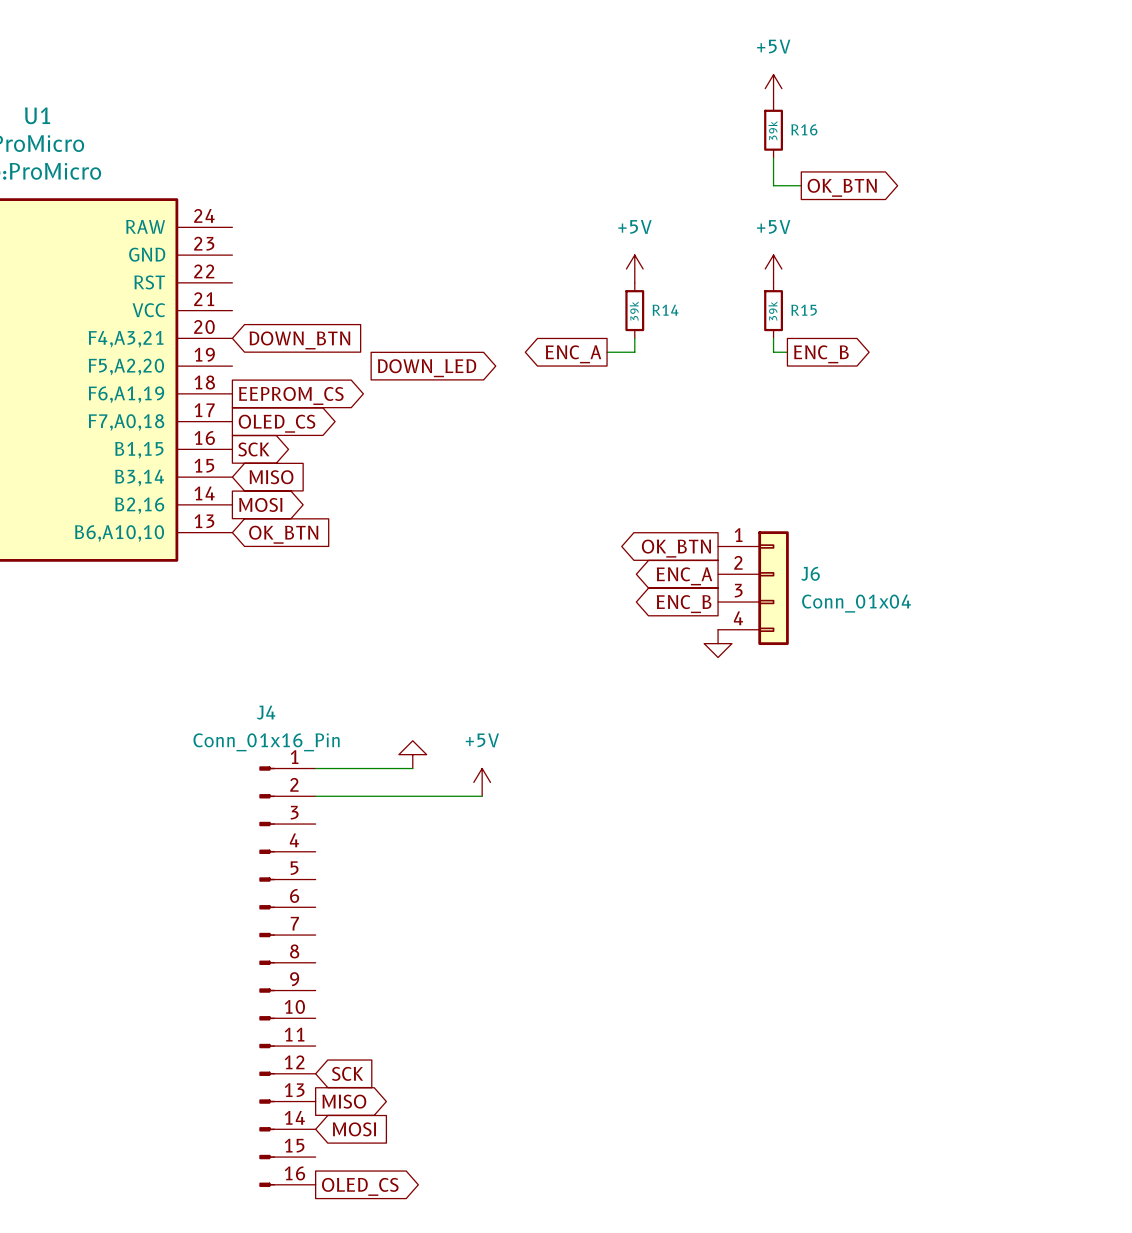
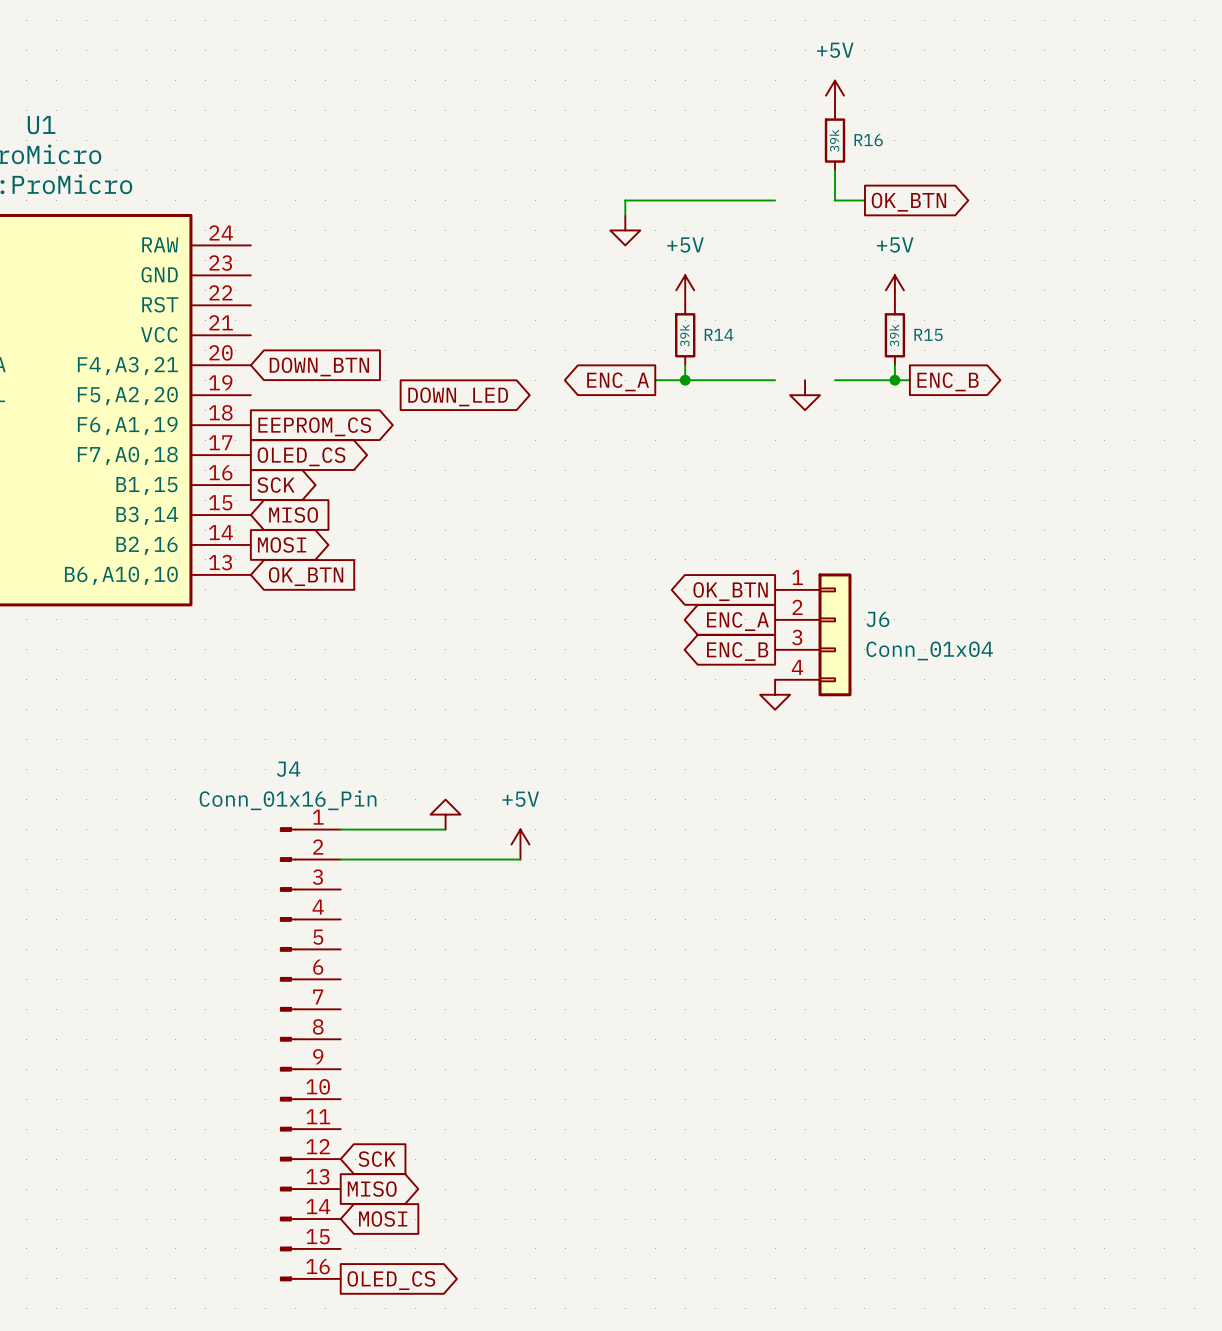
wire: none -> (775, 200) (625, 200) (625, 215)
power symbol: none -> (625, 230)
power symbol position: +5V (773, 268) -> +5V (894, 290)
R15 position: (773, 310) -> (894, 335)
wire: (773, 338) (773, 352) -> (894, 365) (894, 380)
wire: none -> (685, 380) (775, 380)
junction: none -> (685, 380)
wire: none -> (849, 380) (909, 380)
junction: none -> (894, 380)
global label position: ENC_B (821, 354) -> ENC_B (948, 381)
power symbol: none -> (805, 395)

